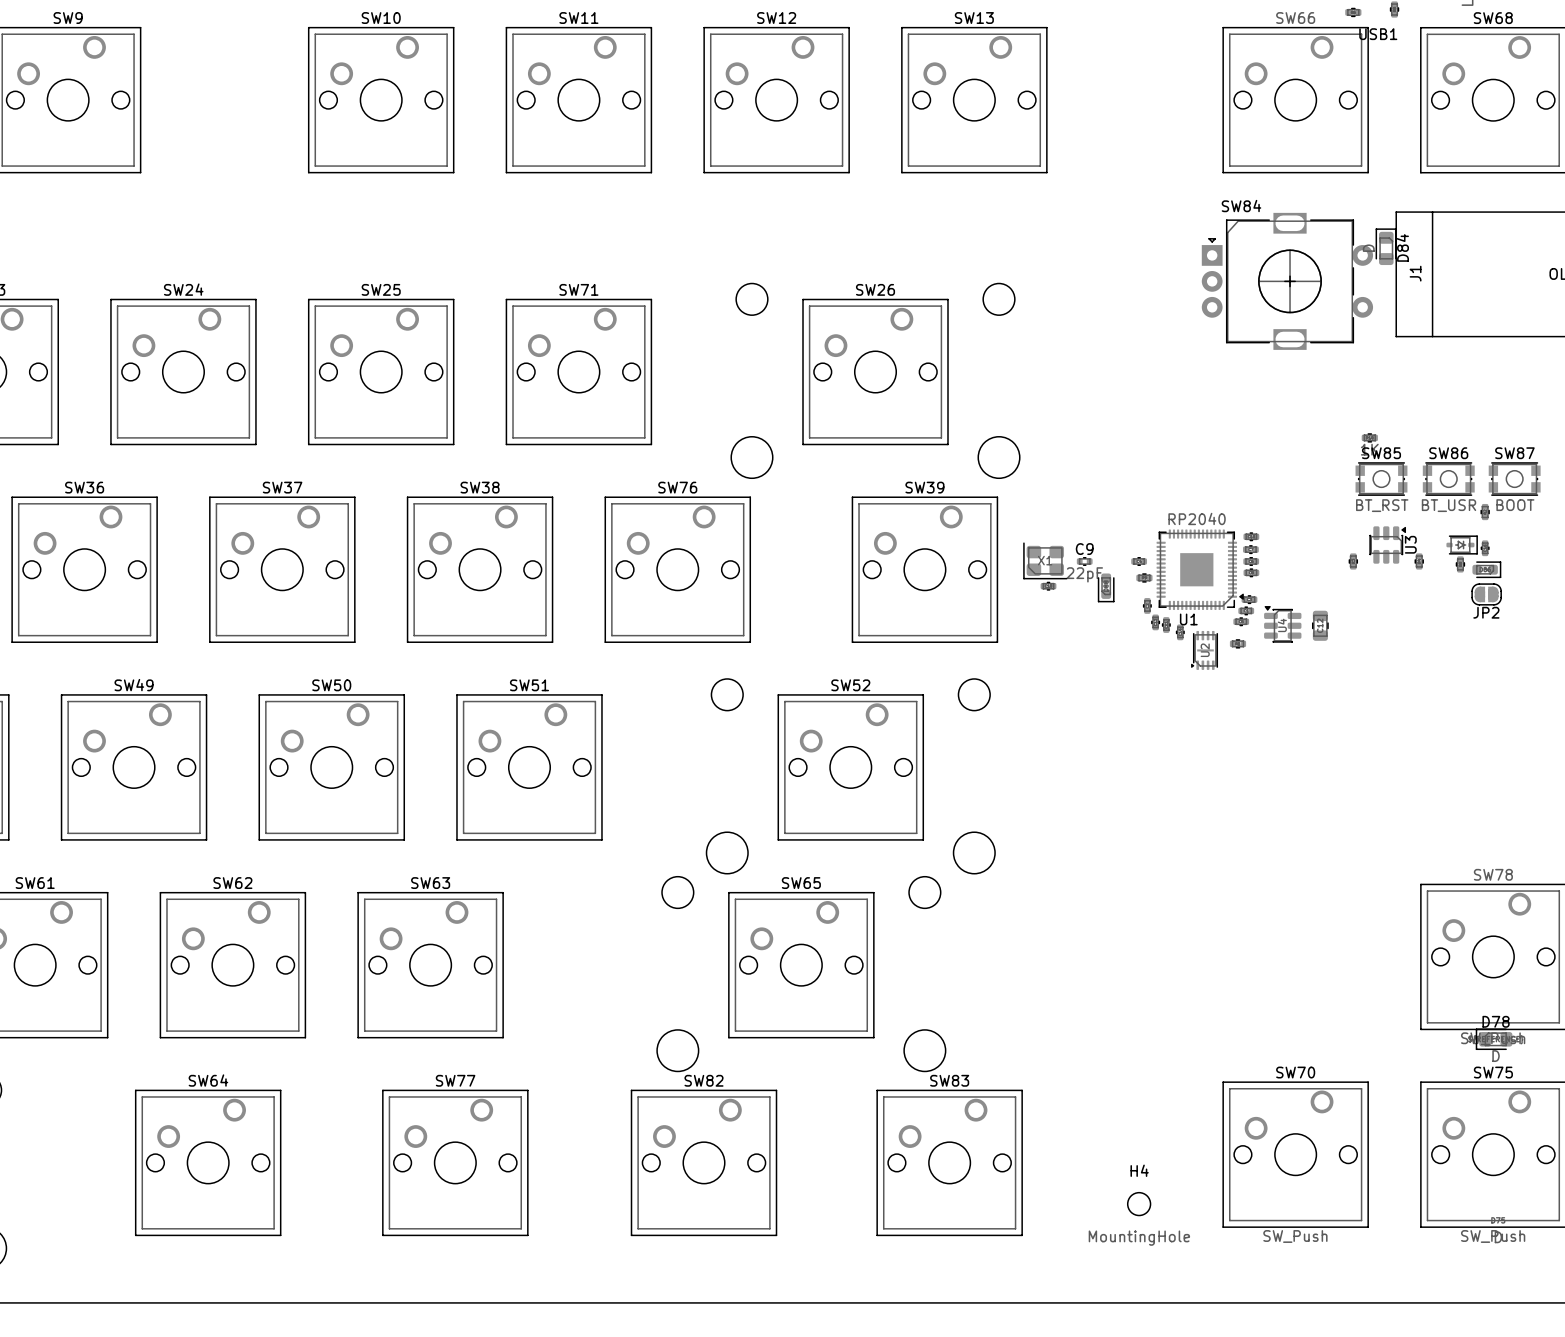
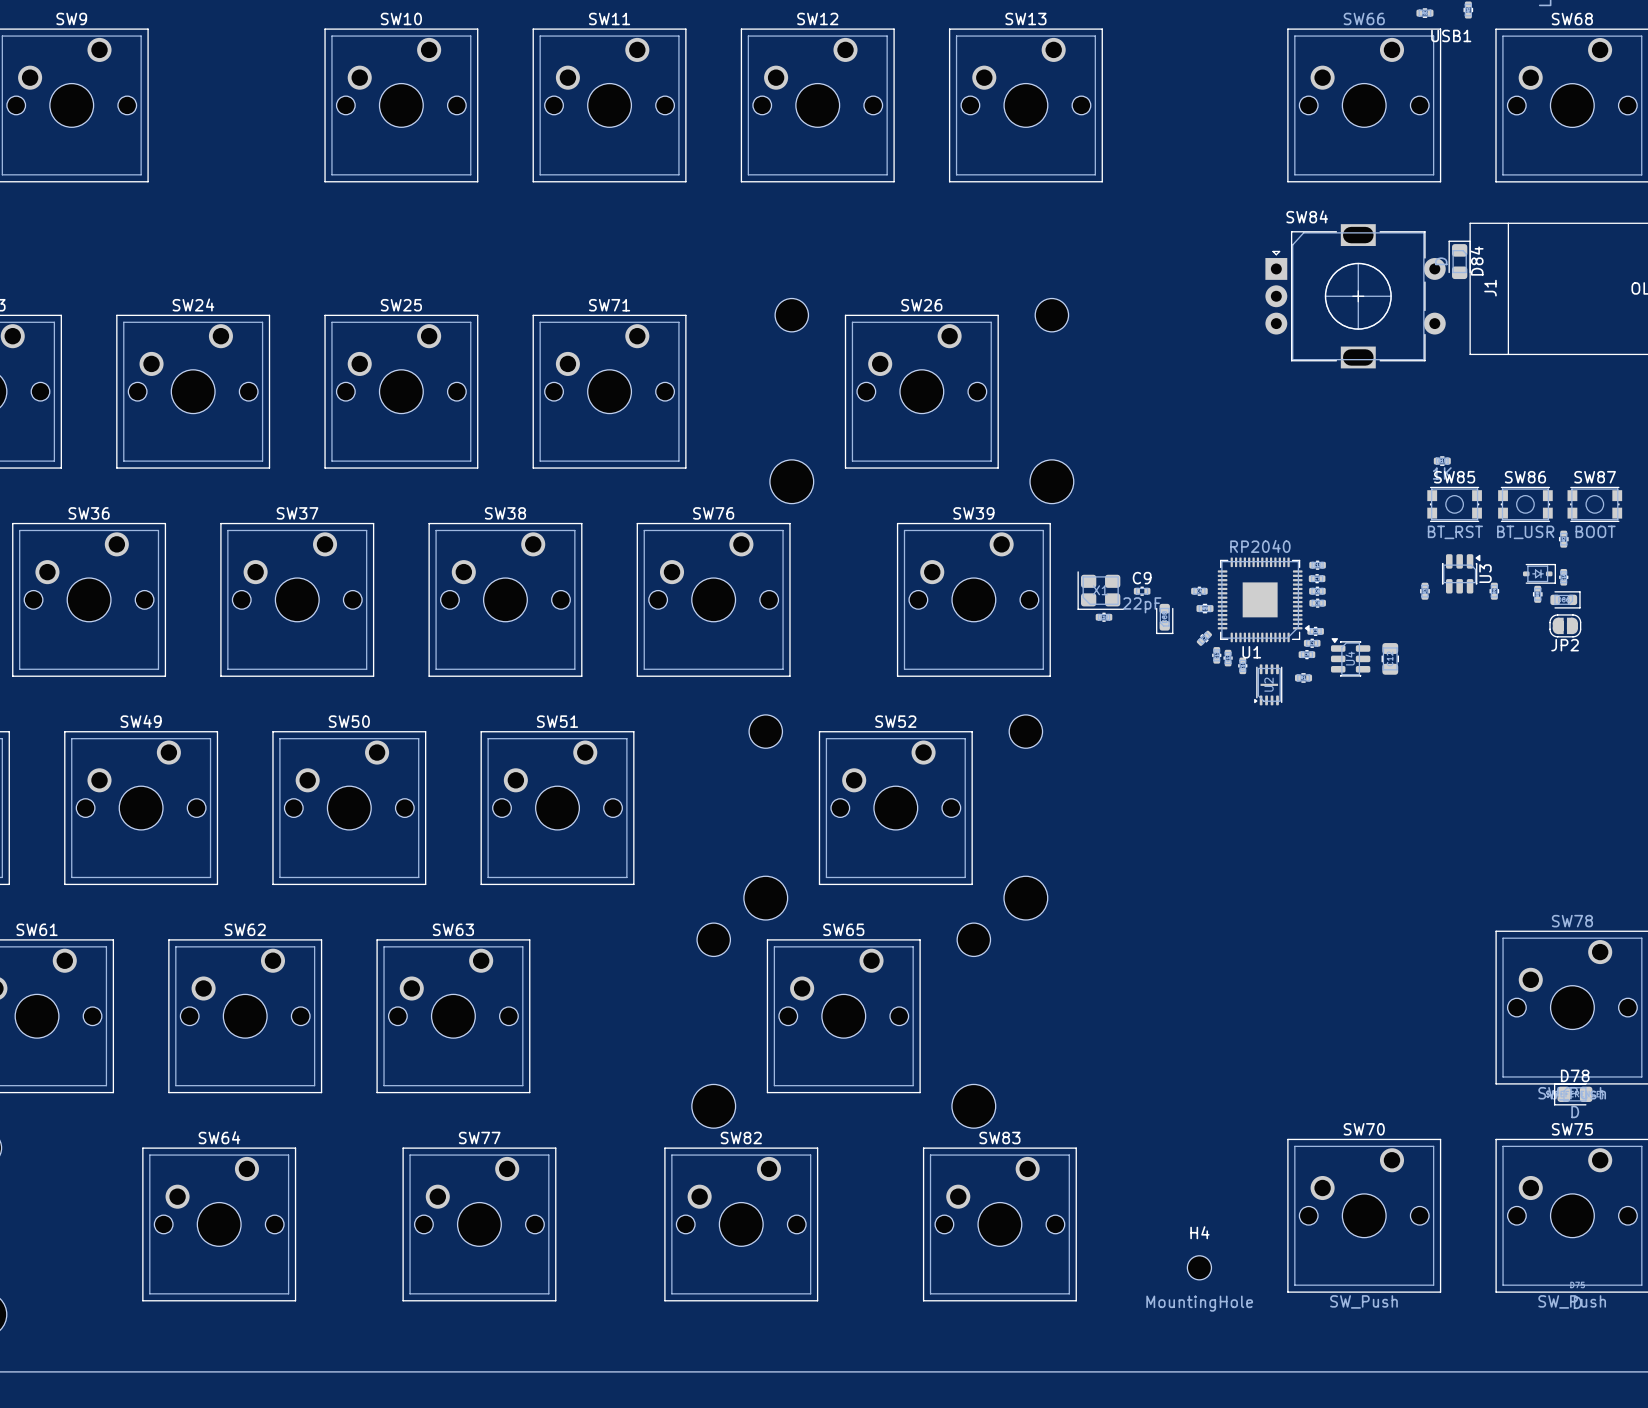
part rotation: 0° (1147, 605) -> 45° clockwise (1204, 638)

